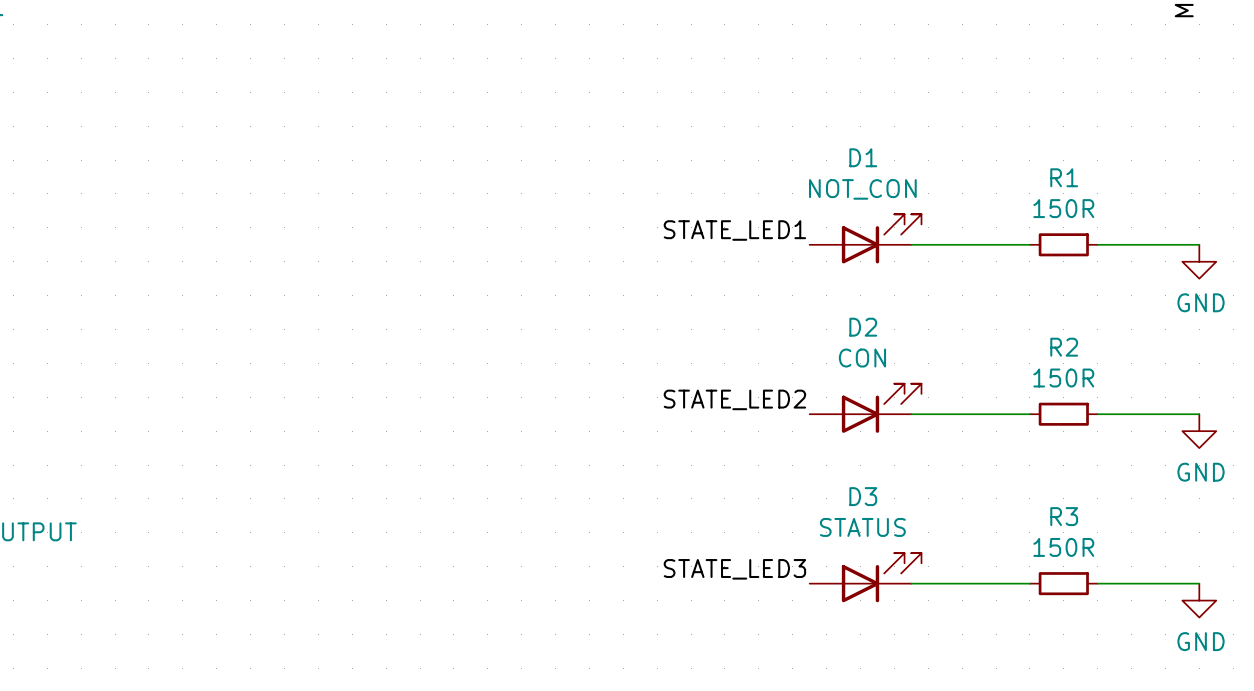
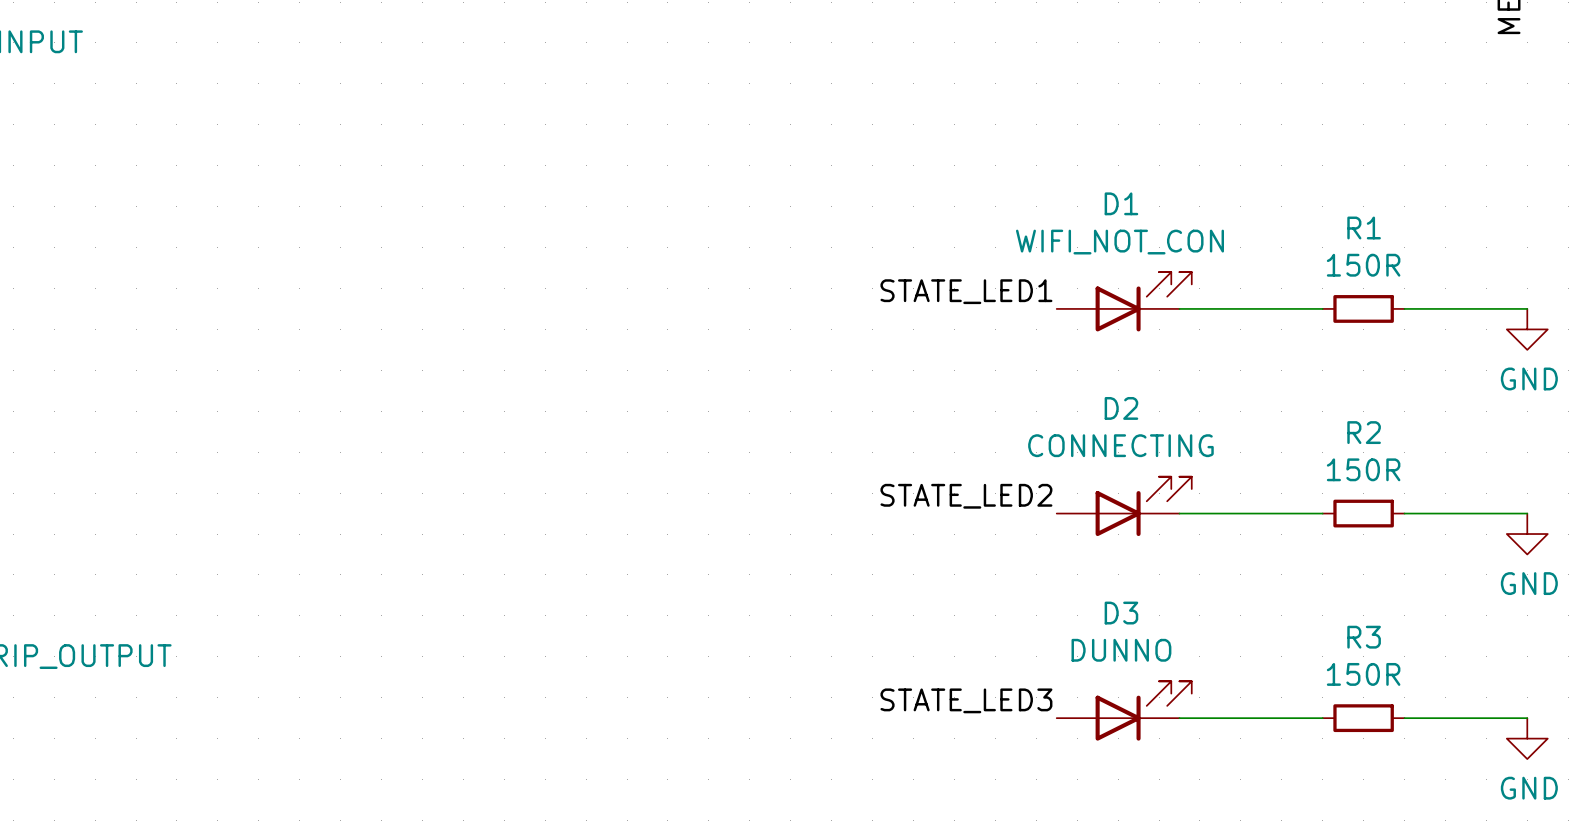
D1 value: NOT_CON (862, 189) -> WIFI_NOT_CON (1119, 242)
D2 value: CON (862, 358) -> CONNECTING (1120, 445)
D3 value: STATUS (862, 527) -> DUNNO (1121, 650)

